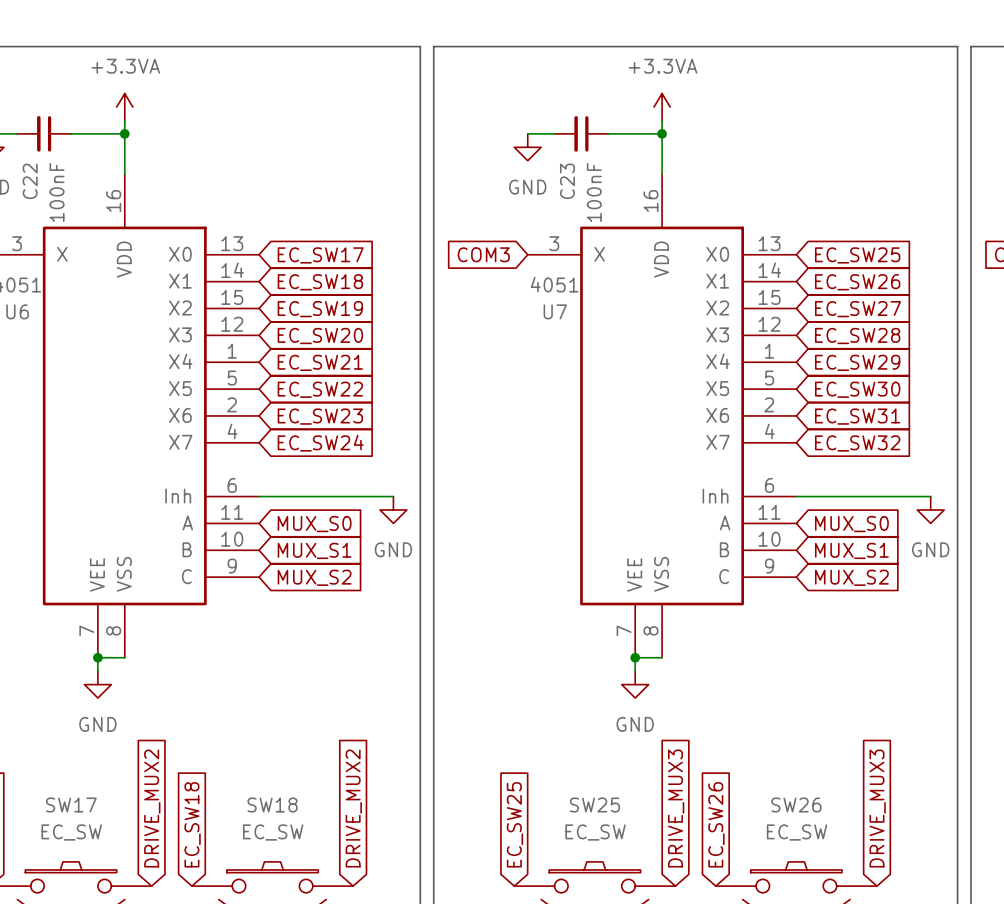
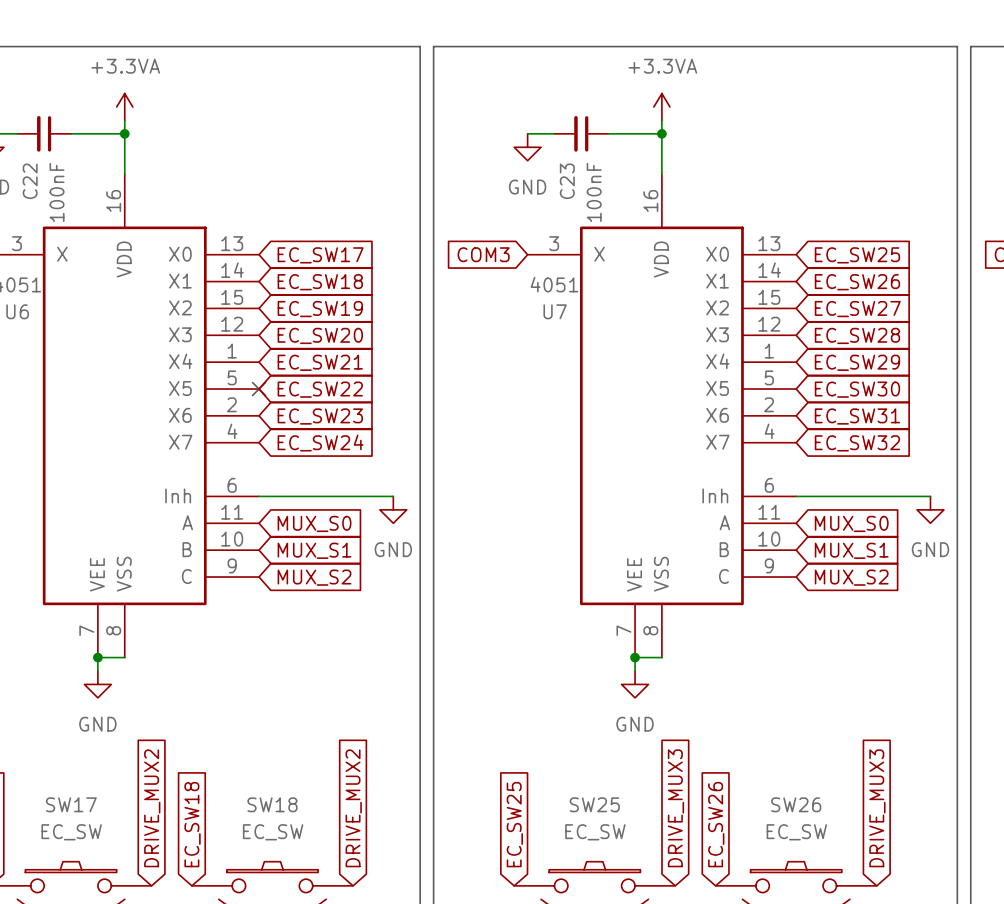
no-connect mark: none -> (259, 389)

